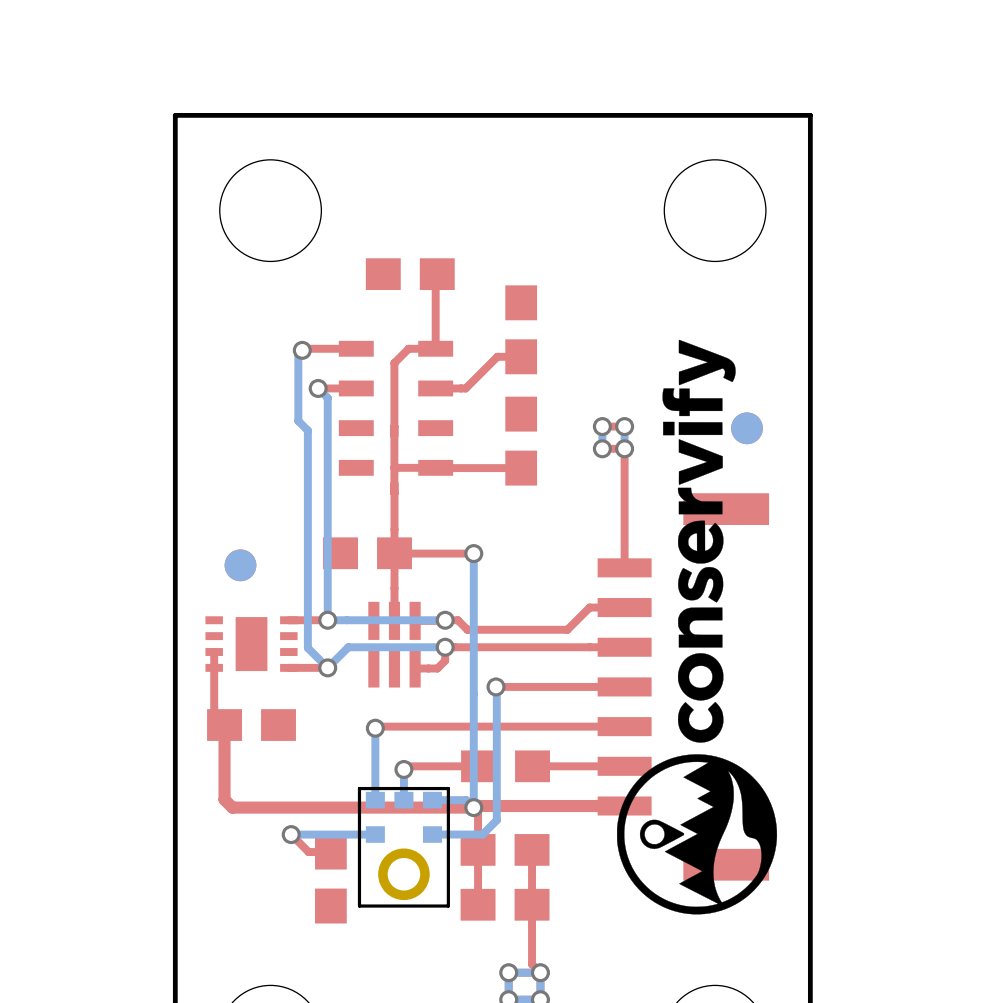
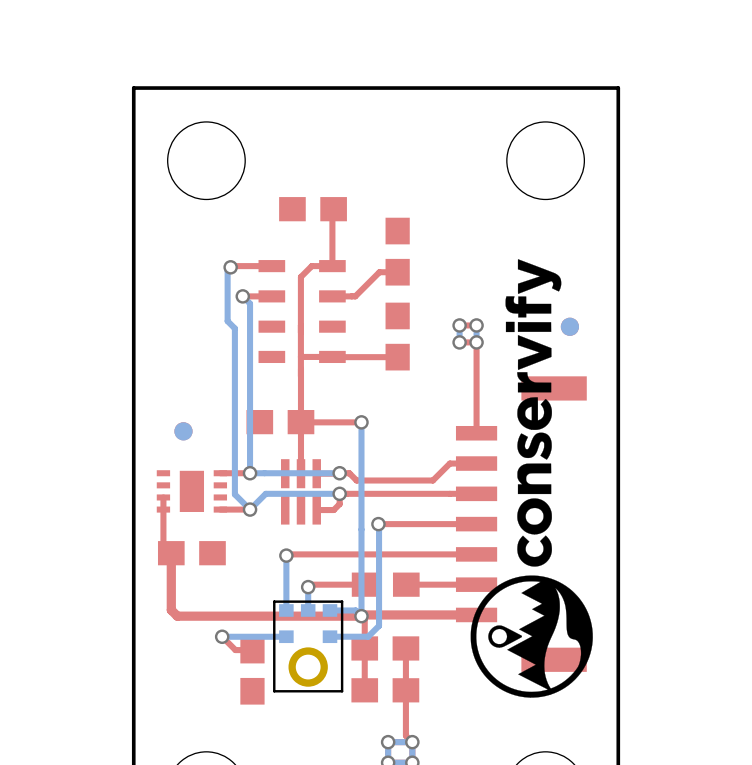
part: (746, 428) -> none
part: none -> (569, 326)
part: (240, 565) -> none
part: none -> (183, 431)

